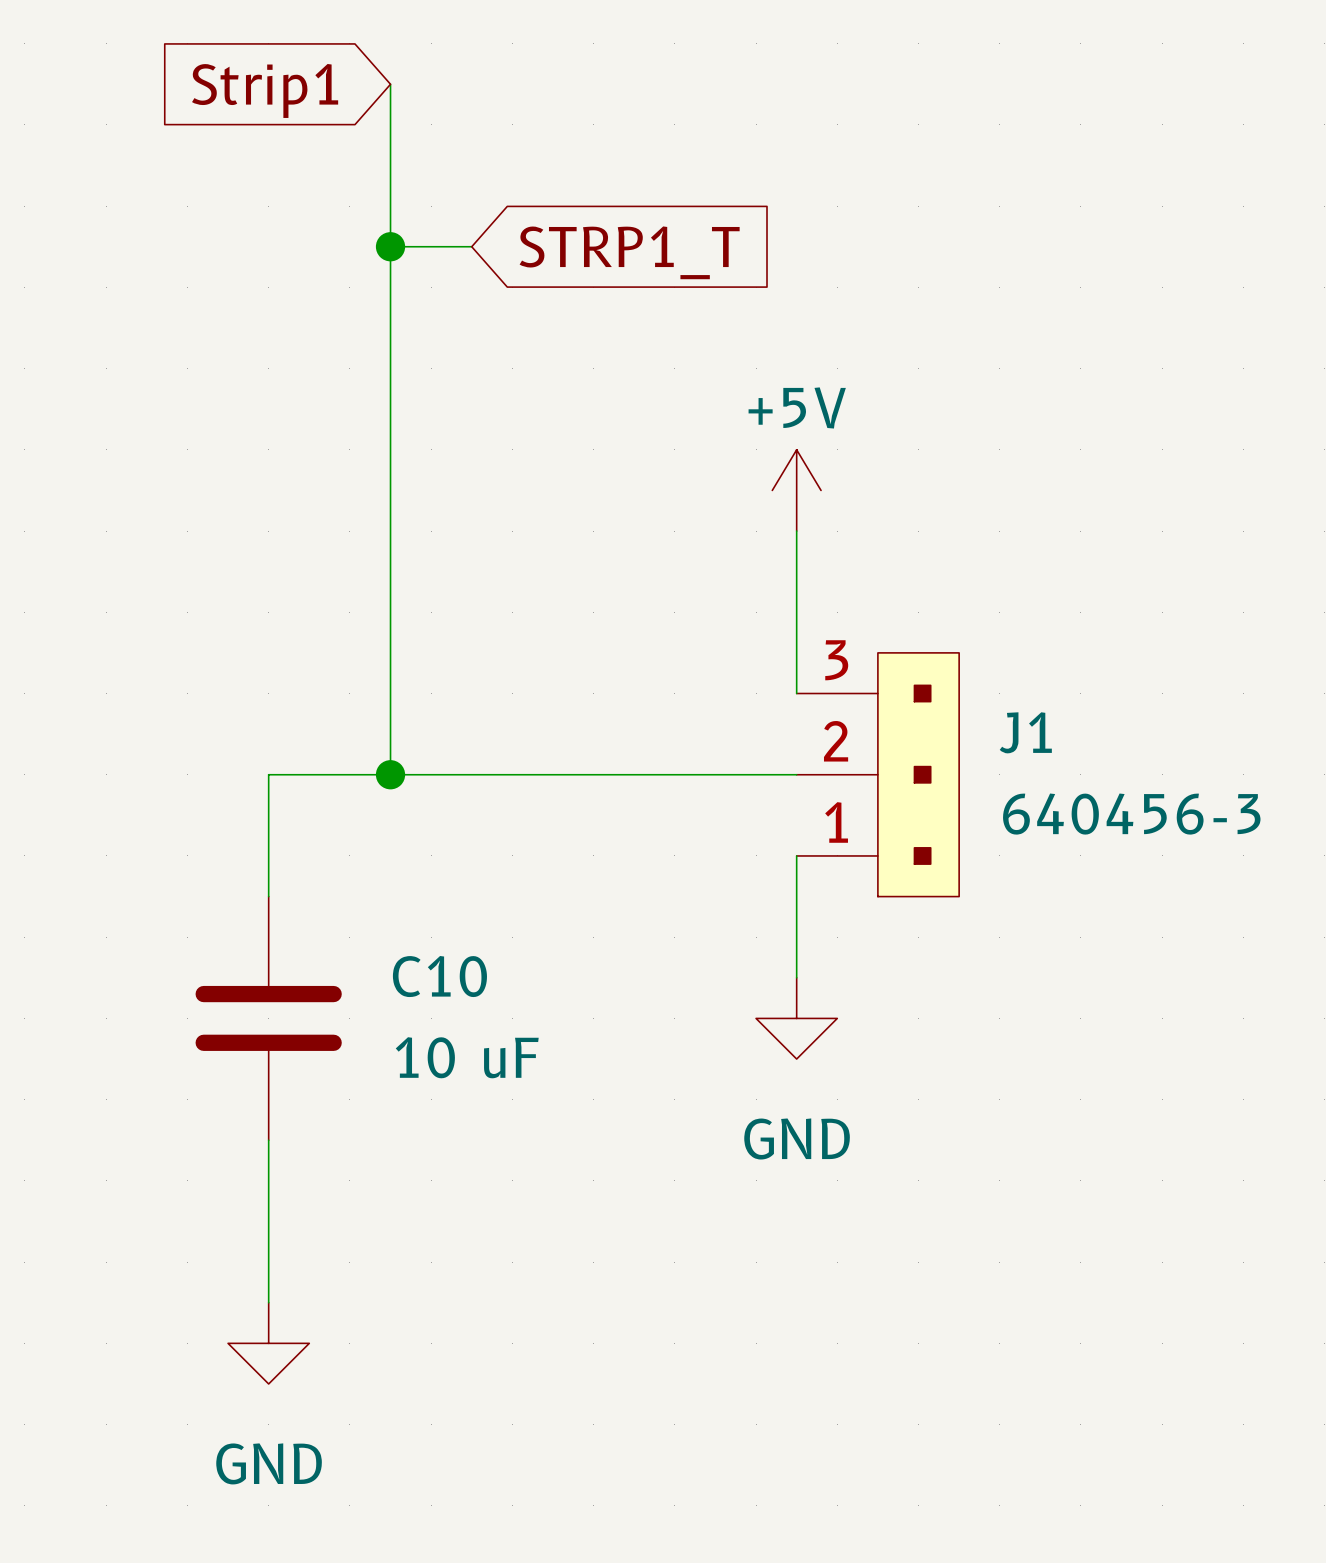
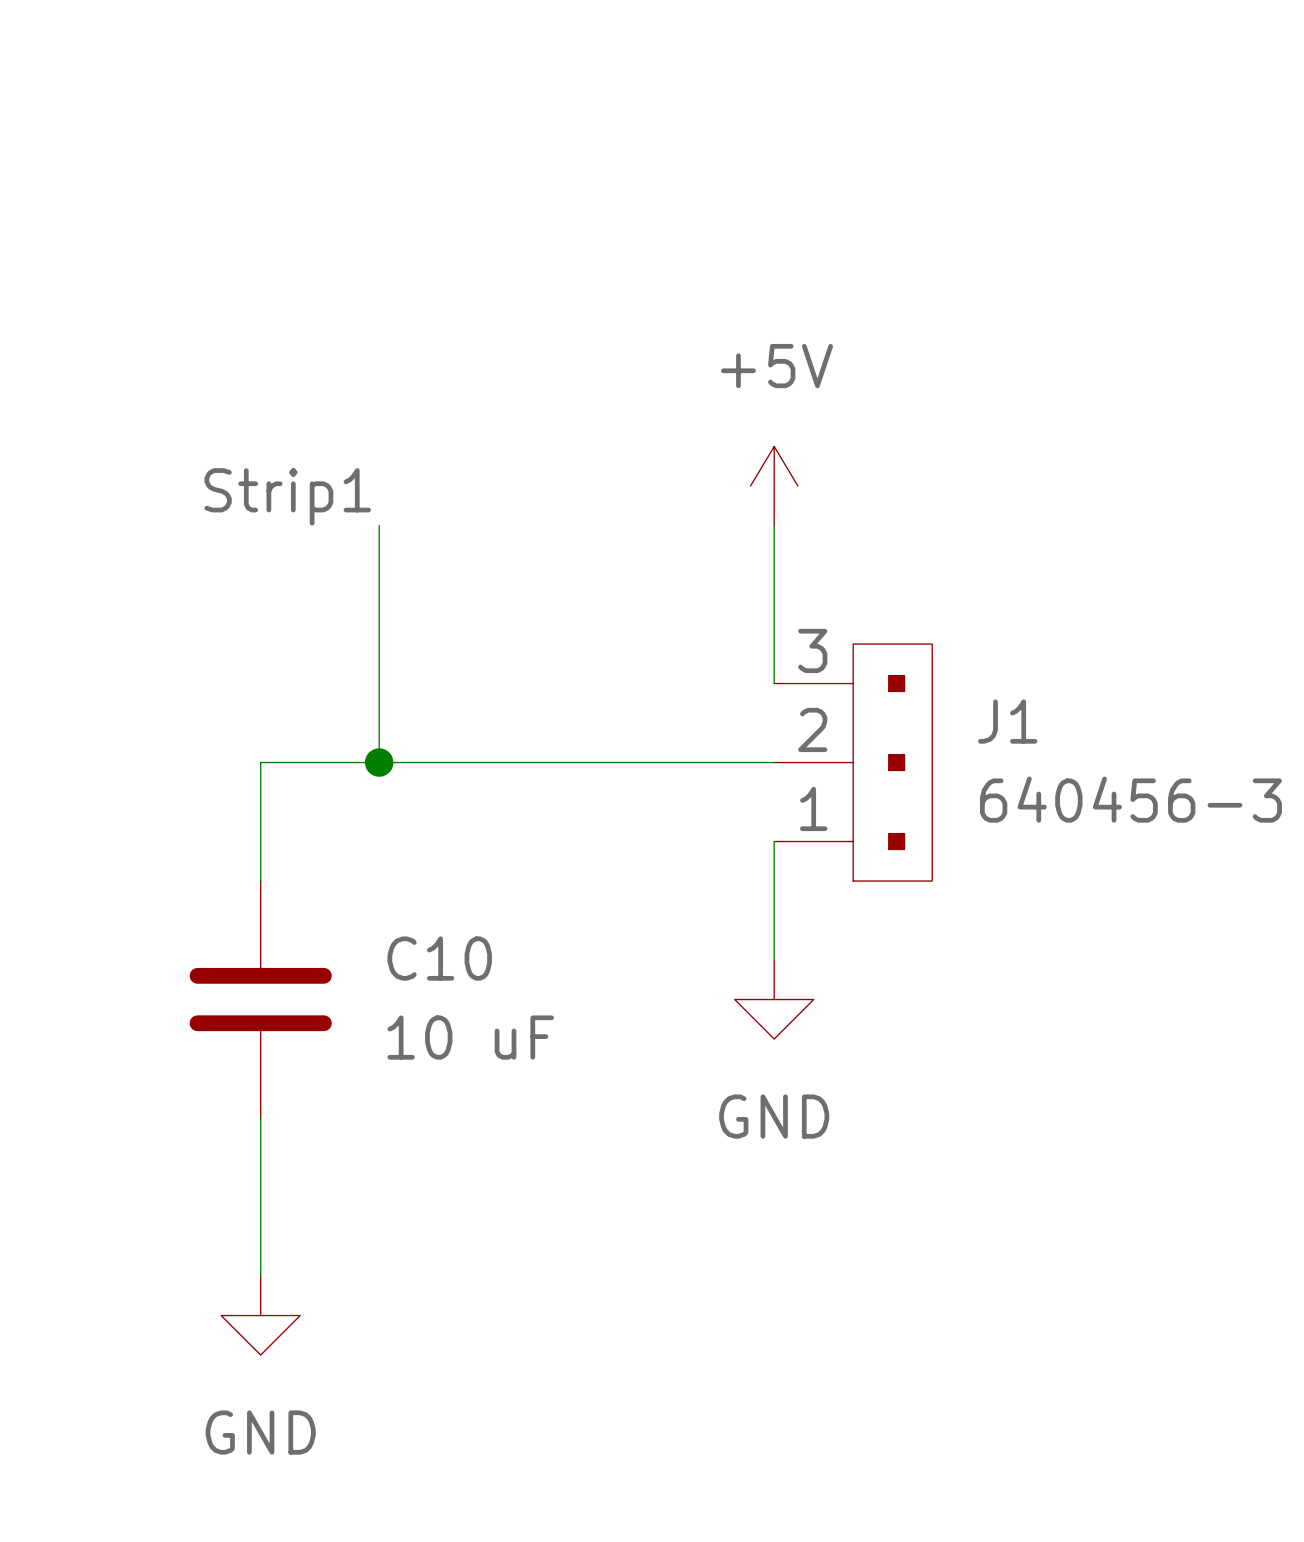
wire: (390, 84) (390, 531) -> none
global label: Strip1 (265, 90) -> none
wire: (390, 246) (471, 246) -> none
junction: (390, 246) -> none
global label: STRP1_T (629, 252) -> none
power symbol text position: +5V (797, 407) -> +5V (777, 366)
label: none -> Strip1 (287, 496)

